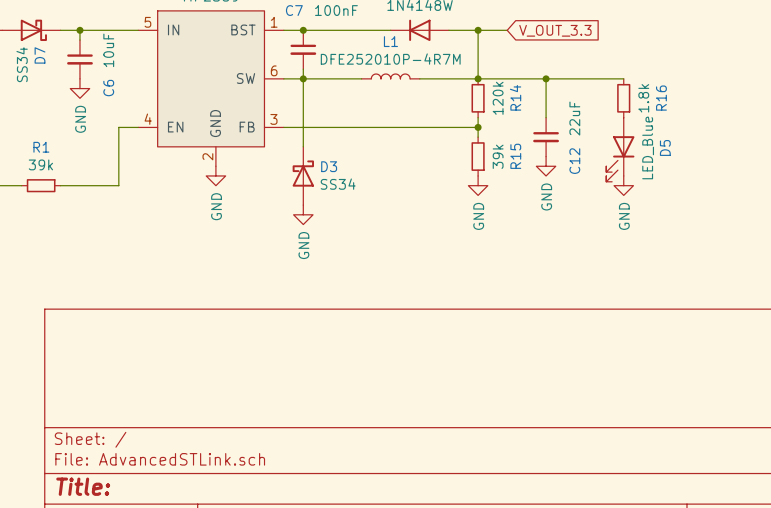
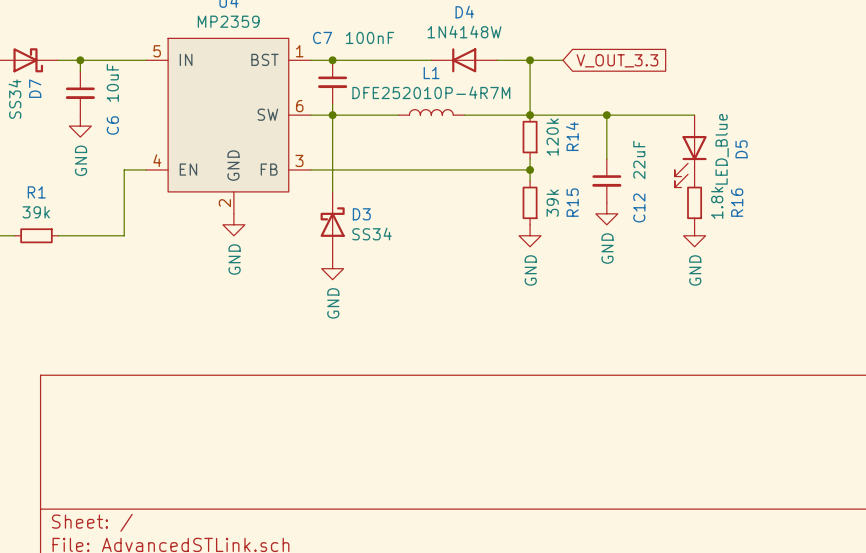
R16 position: (623, 98) -> (694, 202)
D5 position: (620, 149) -> (690, 151)

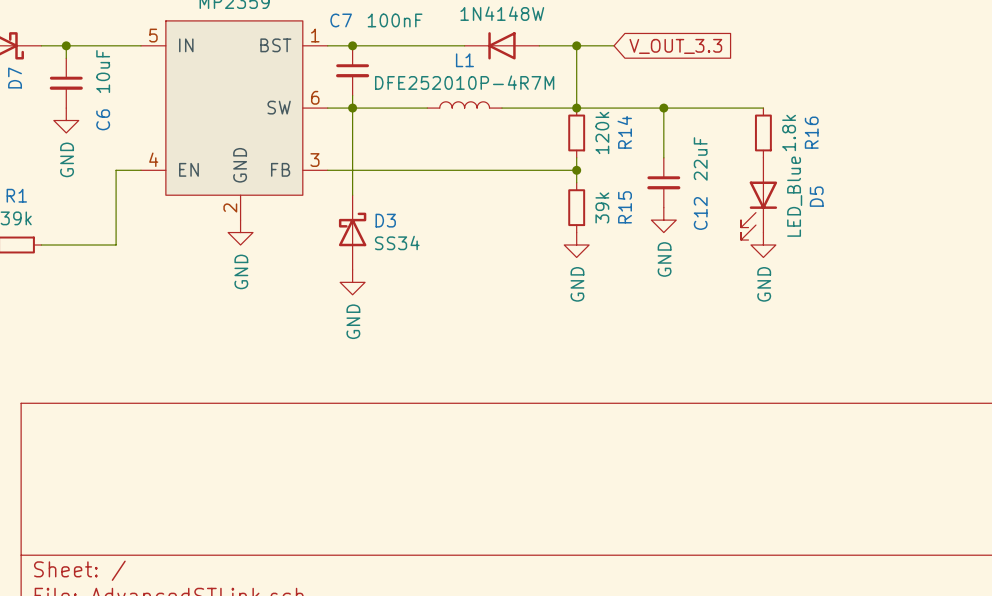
D5 position: (690, 151) -> (759, 198)
R16 position: (694, 202) -> (763, 132)

